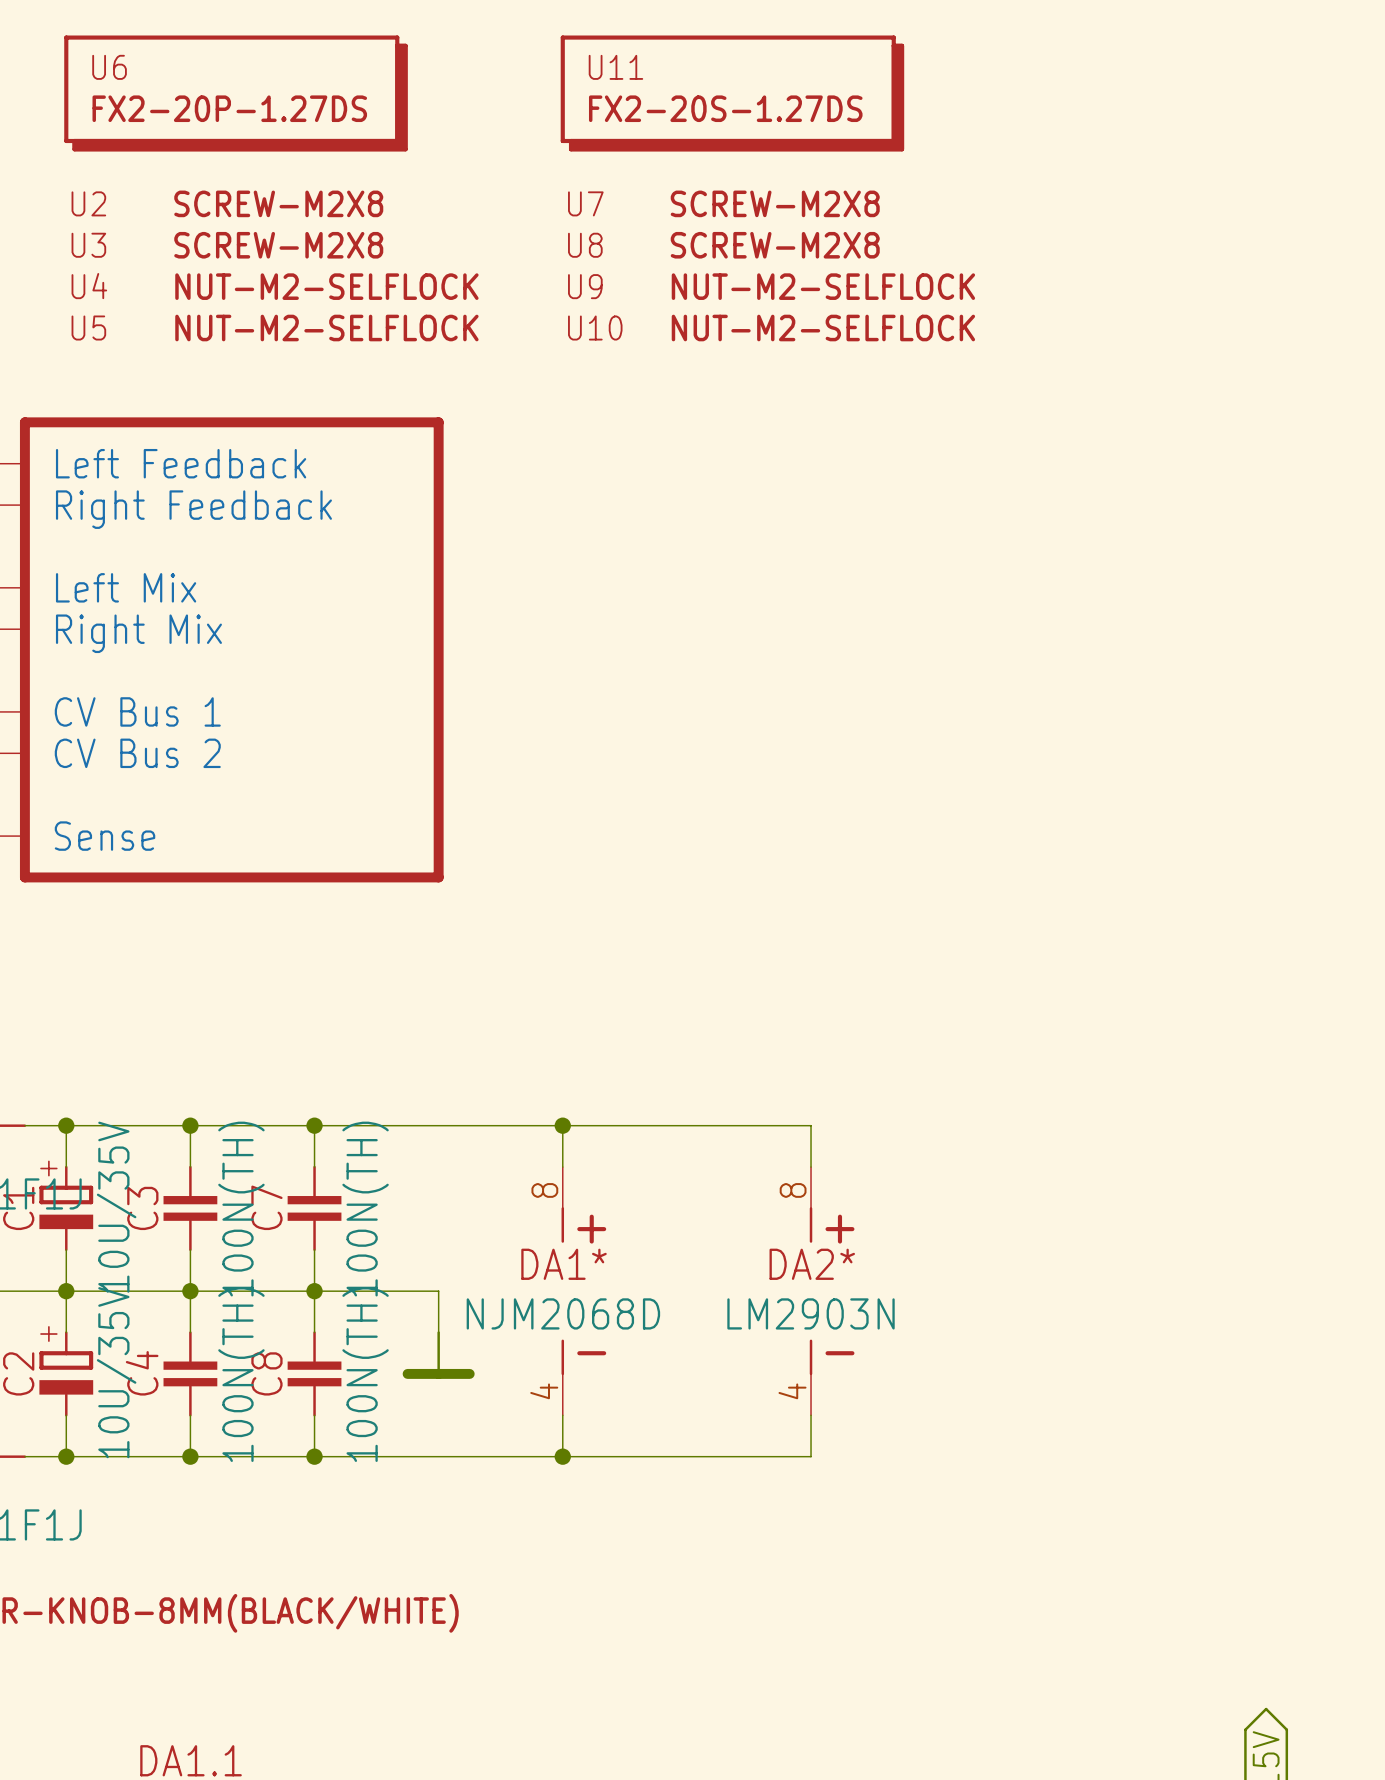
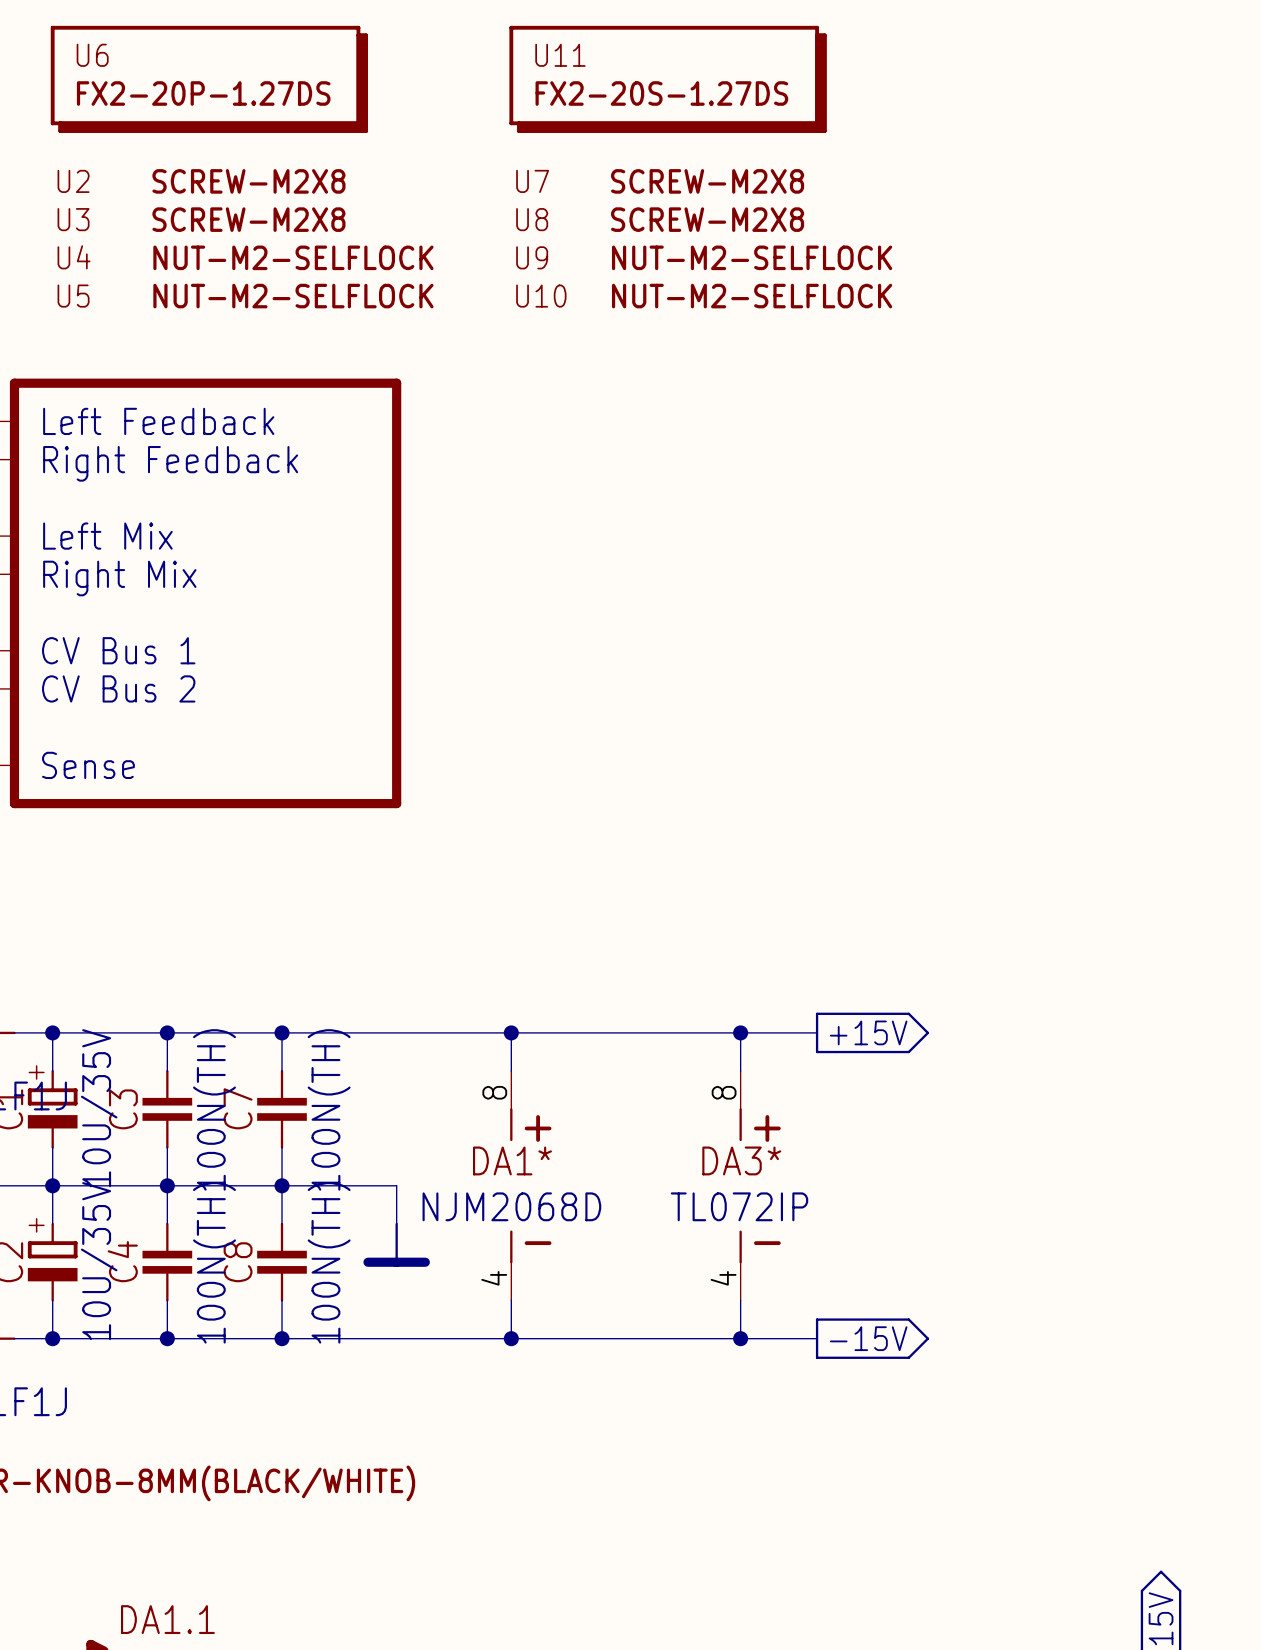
wire: none -> (740, 1032) (817, 1032)
junction: none -> (740, 1032)
power symbol: none -> (872, 1032)
DA2* name: DA2* (812, 1264) -> DA3* (741, 1160)
DA2* value: LM2903N (811, 1313) -> TL072IP (739, 1206)
wire: none -> (740, 1338) (817, 1338)
junction: none -> (740, 1338)
power symbol: none -> (872, 1338)

